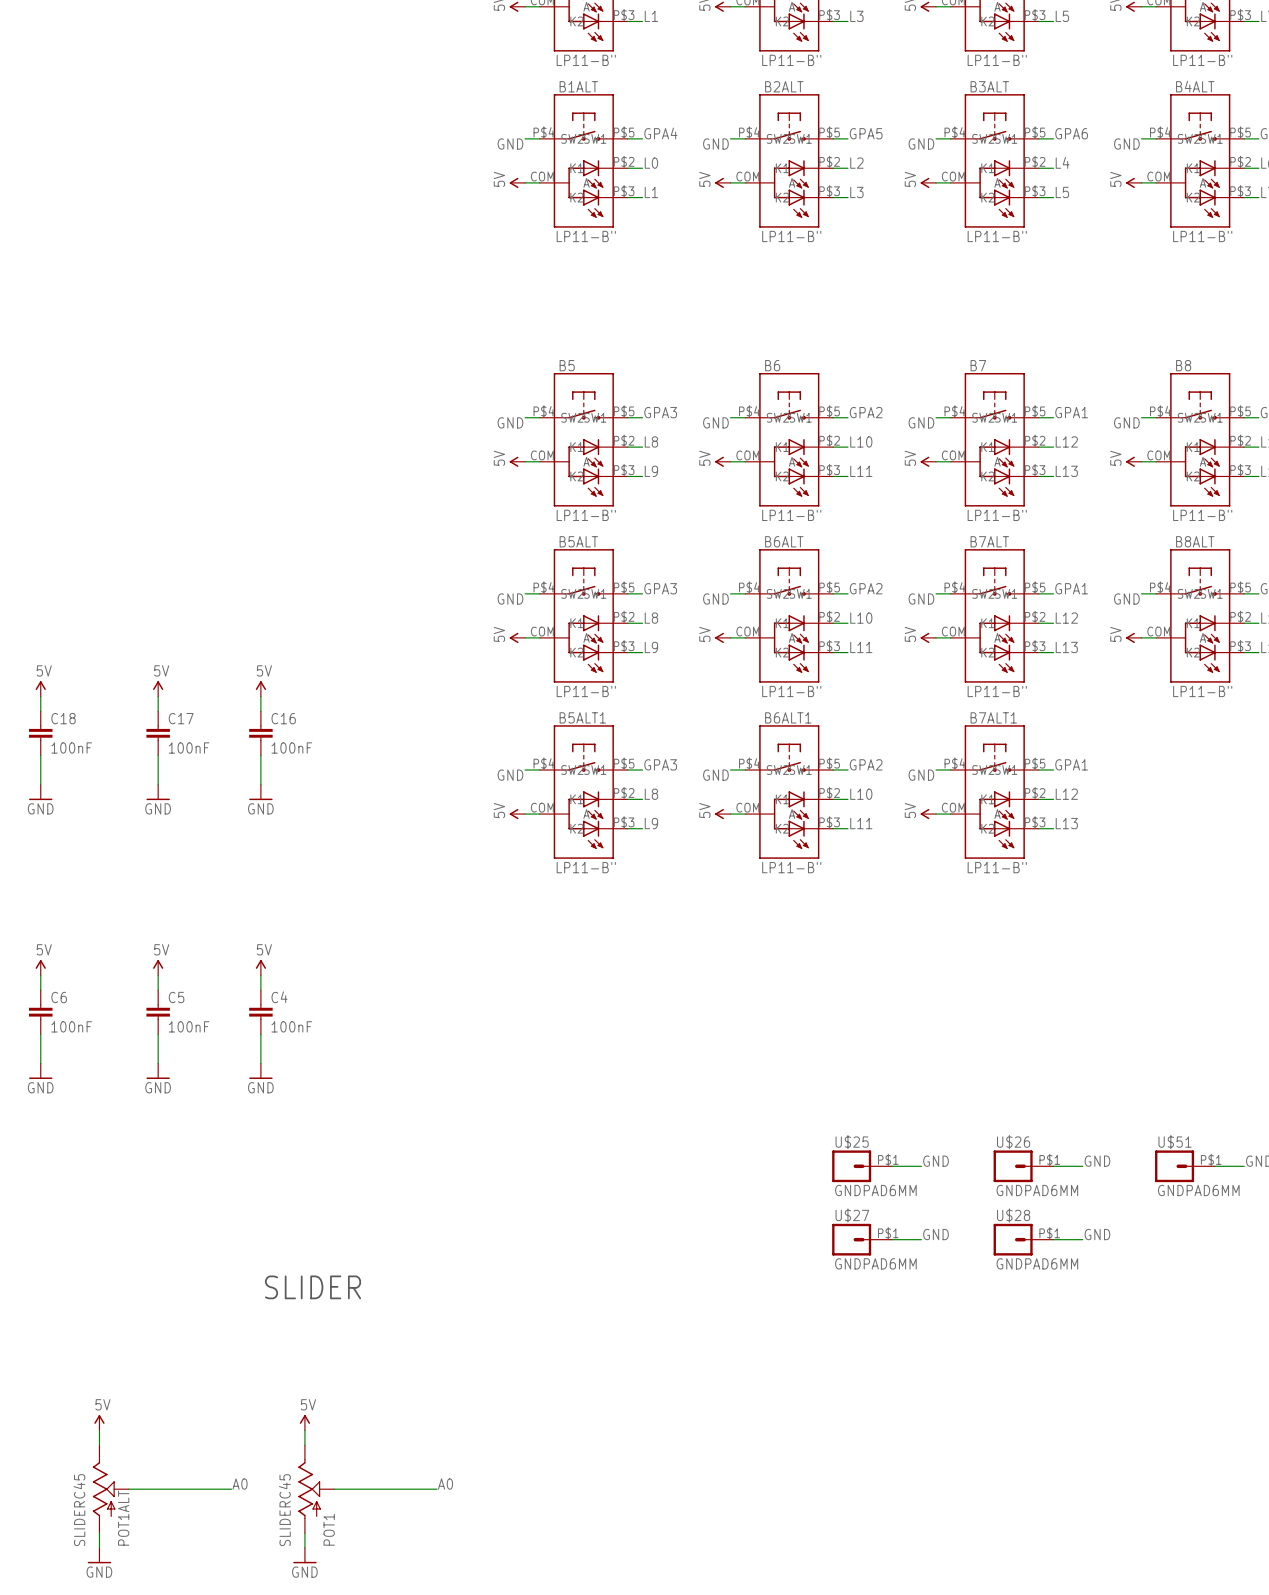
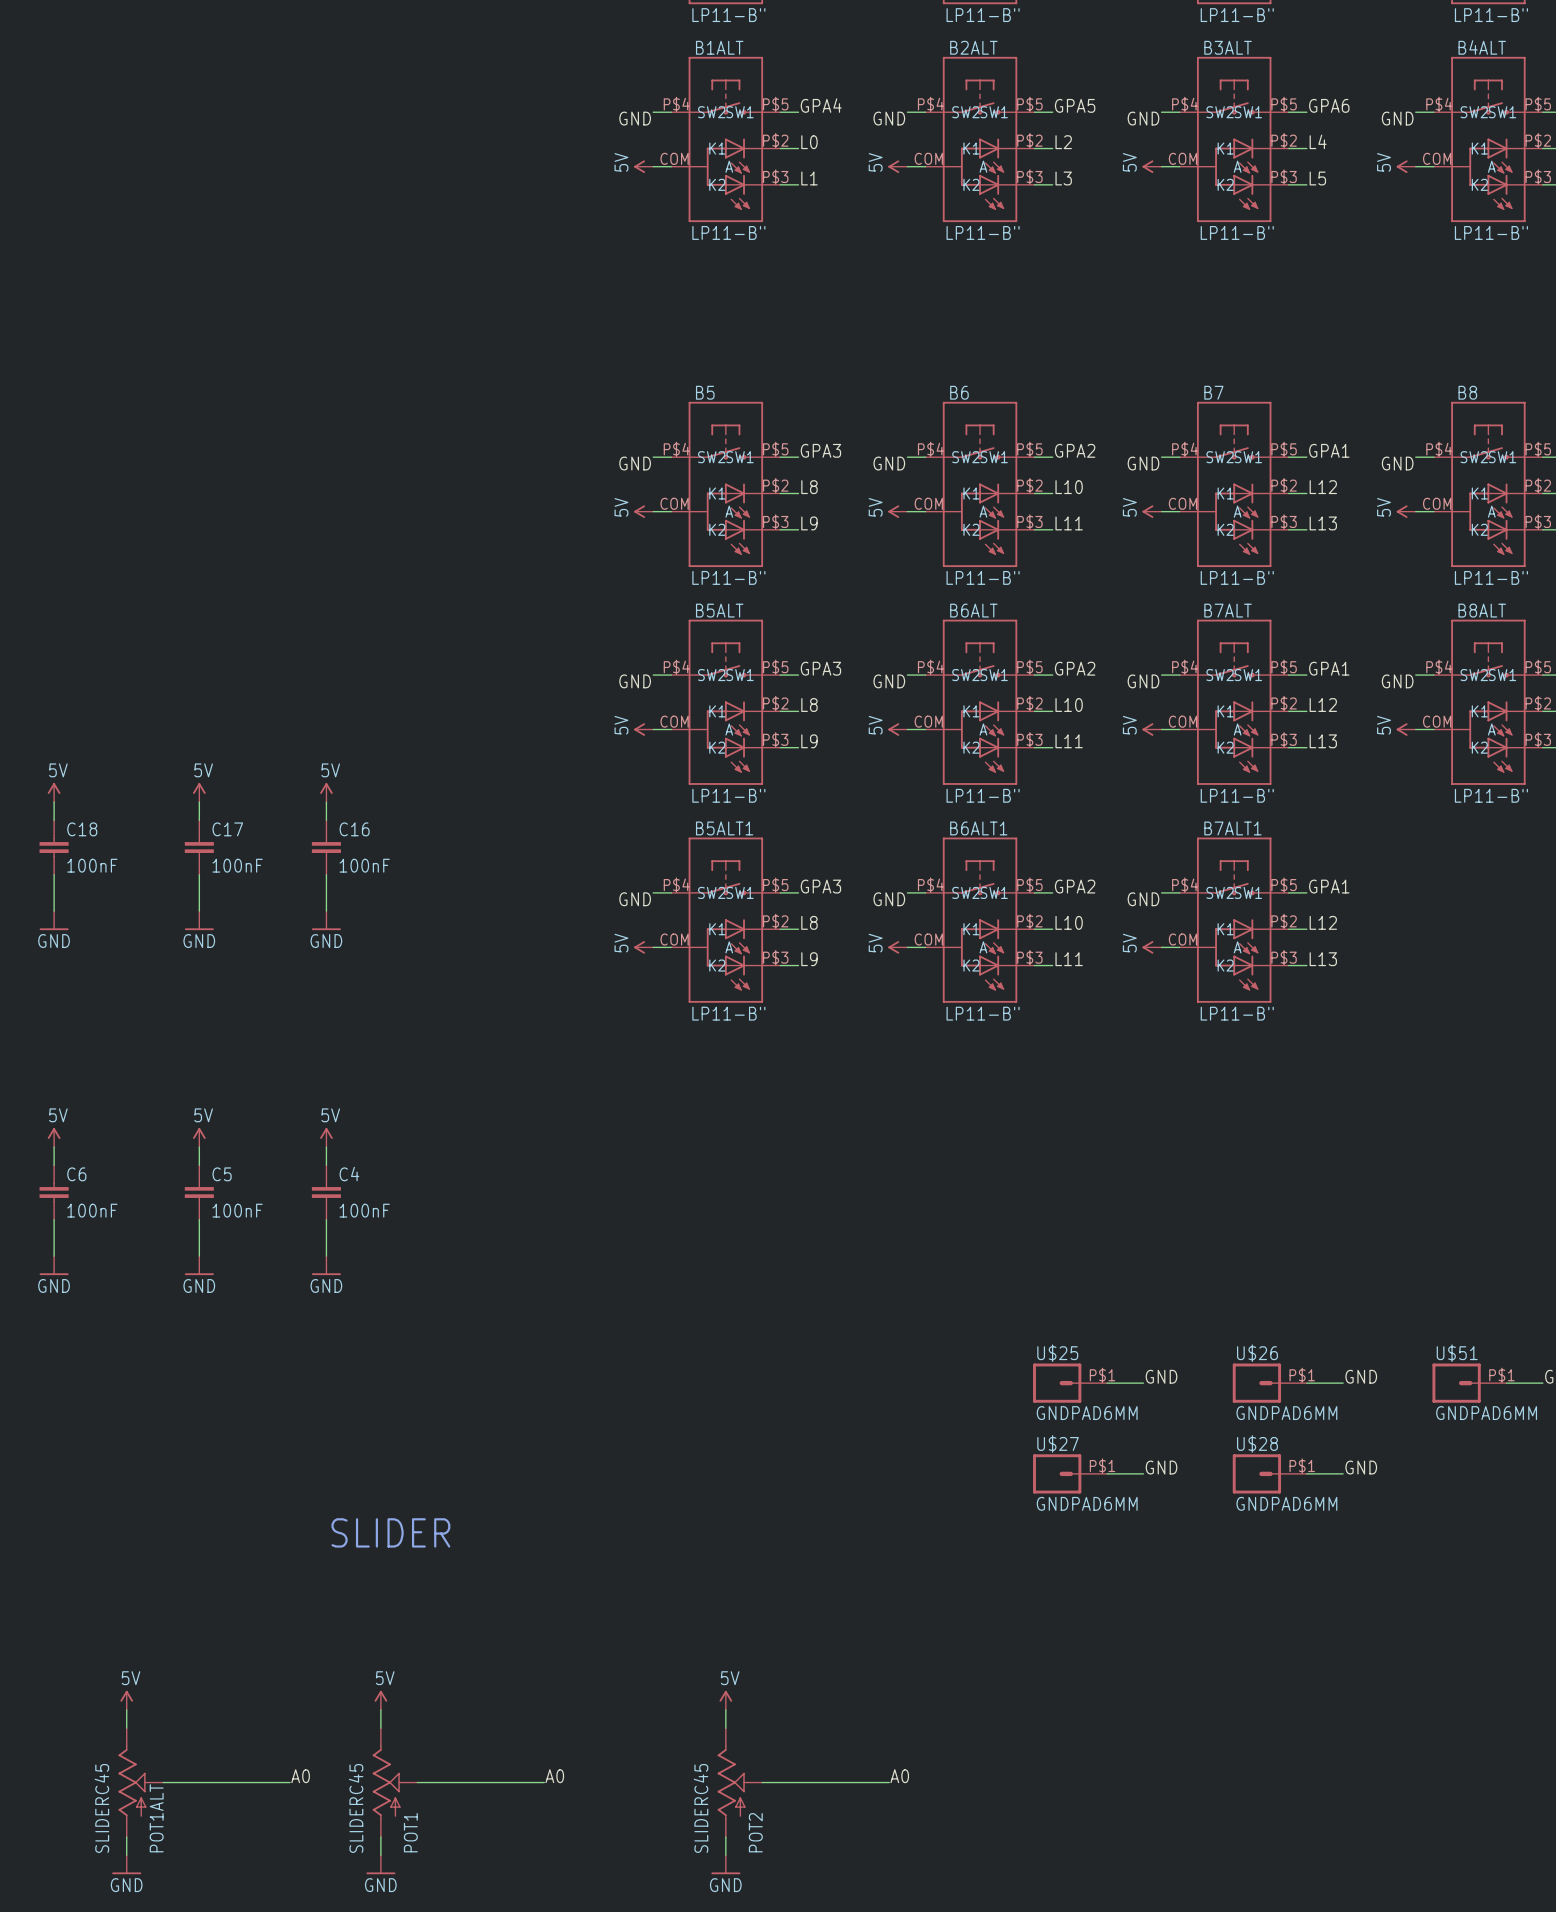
power symbol: none -> 5V (725, 1700)
wire: none -> (725, 1709) (725, 1728)
label: none -> A0 (899, 1776)
POT2: none -> SLIDERC45 (739, 1782)
wire: none -> (762, 1782) (889, 1782)
wire: none -> (725, 1837) (725, 1855)
power symbol: none -> GND (725, 1864)

